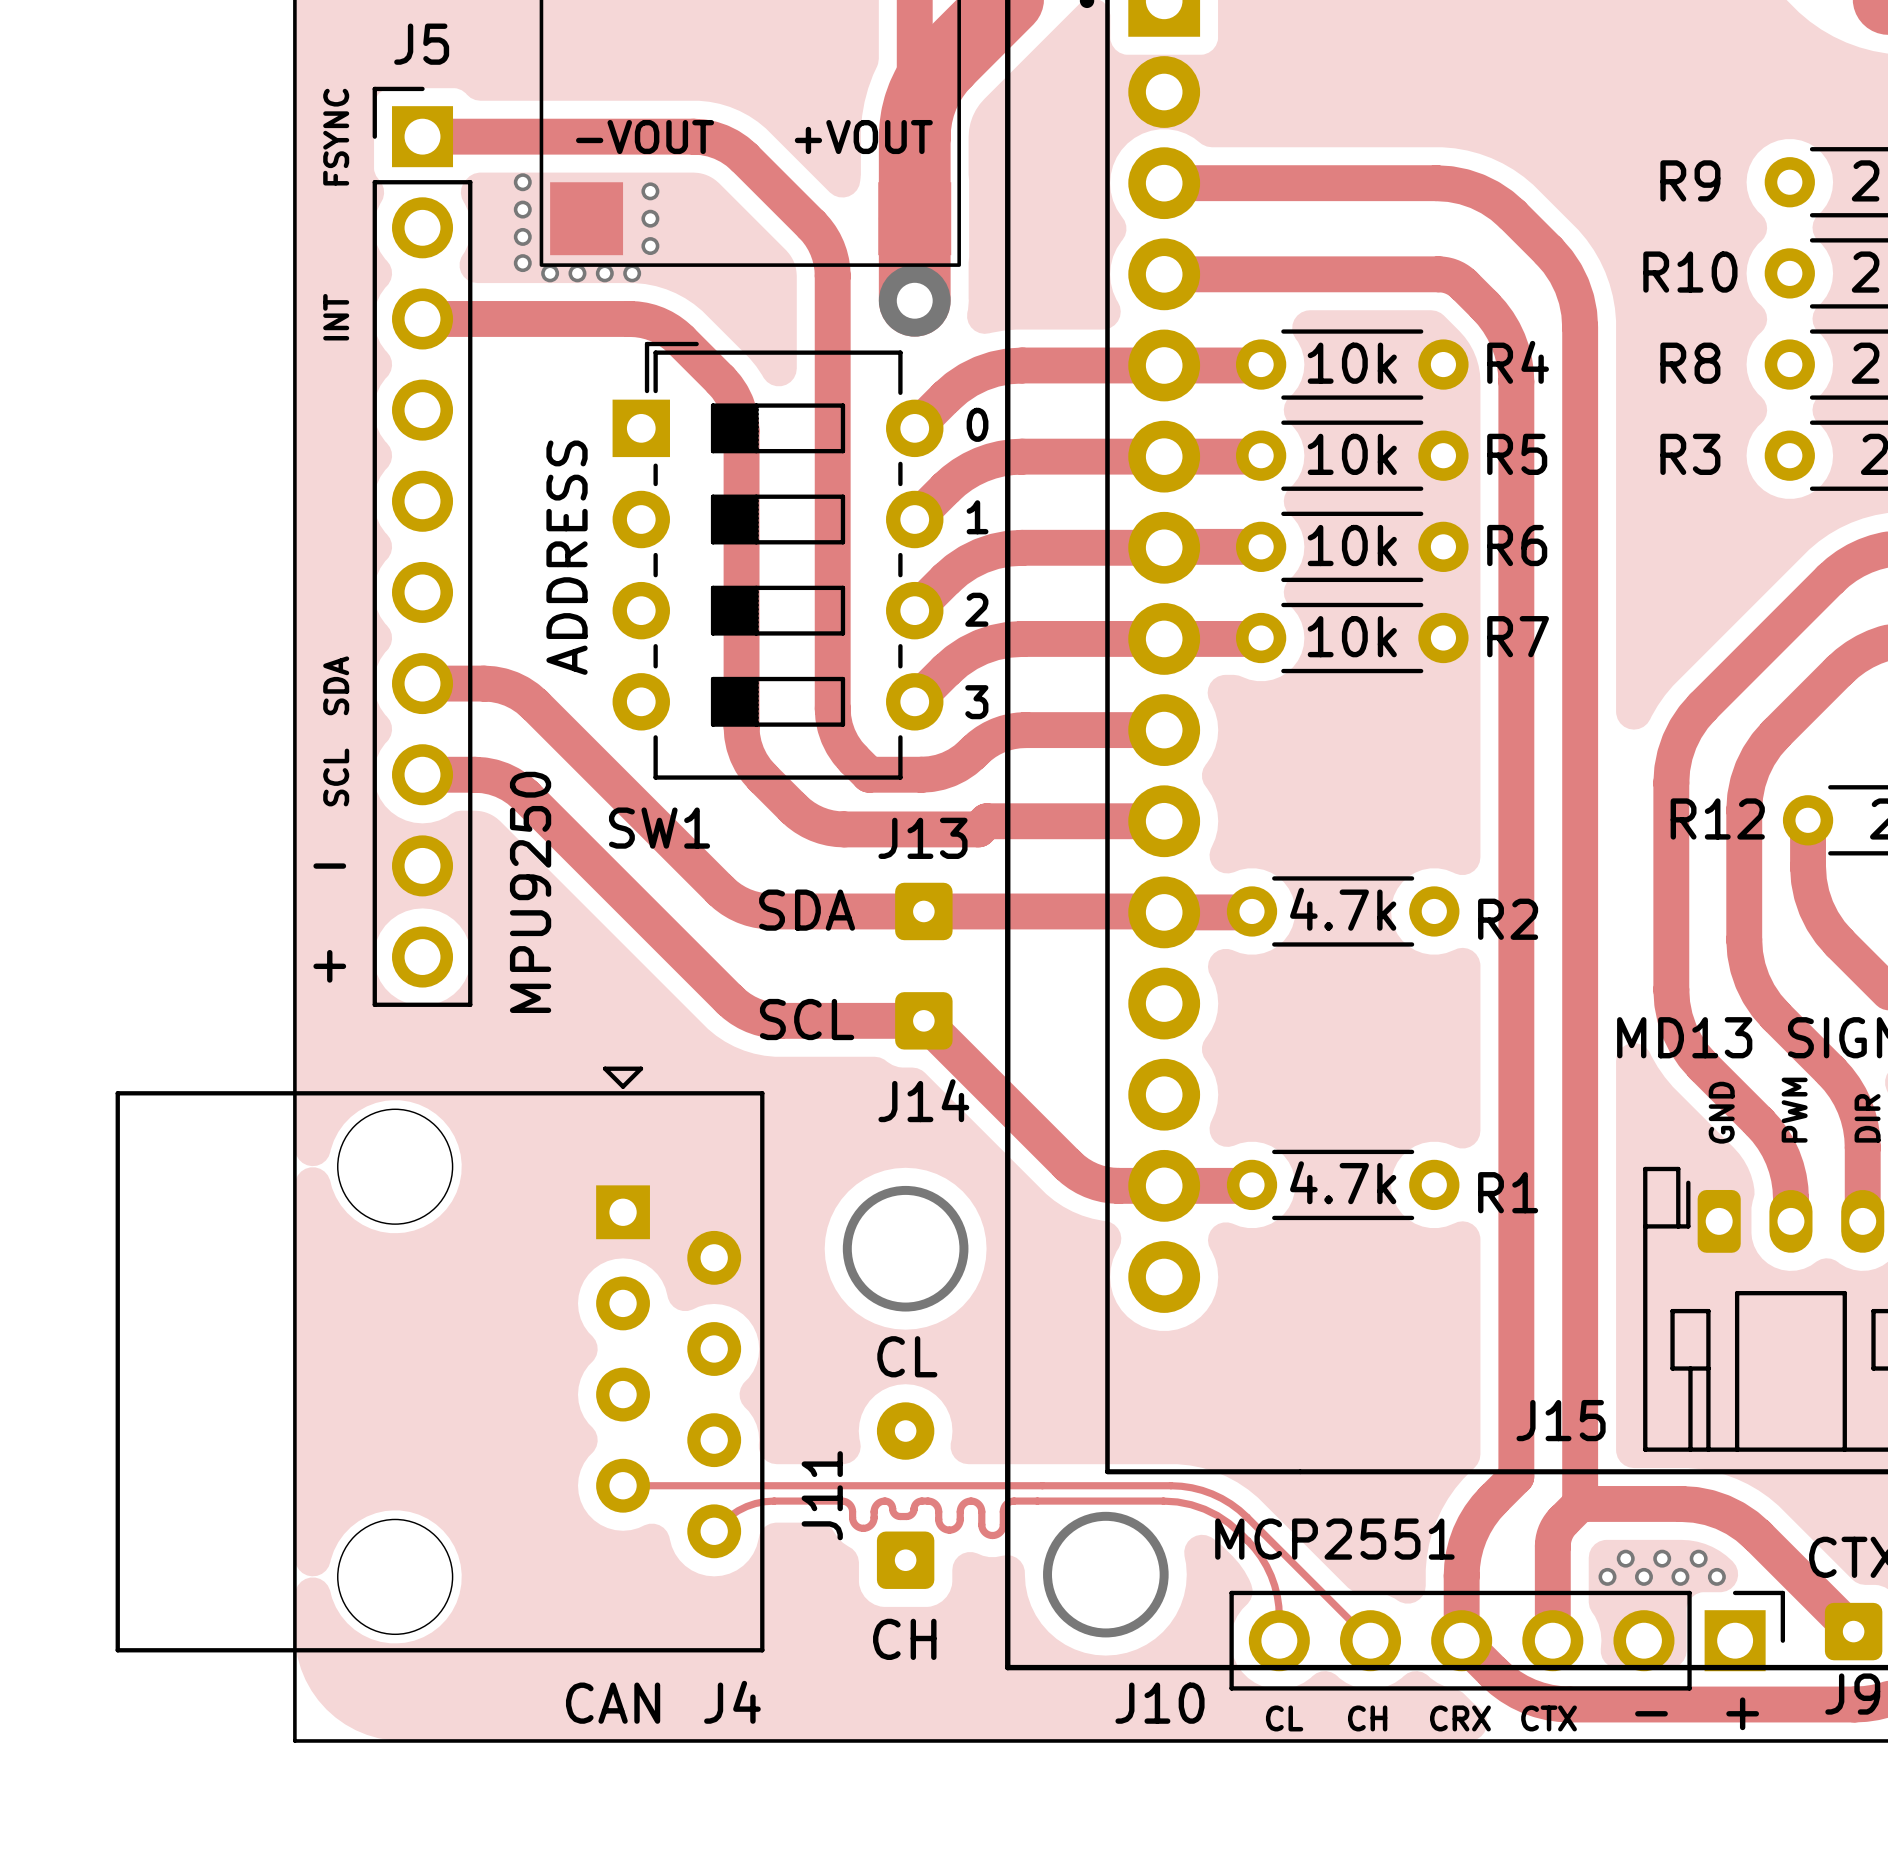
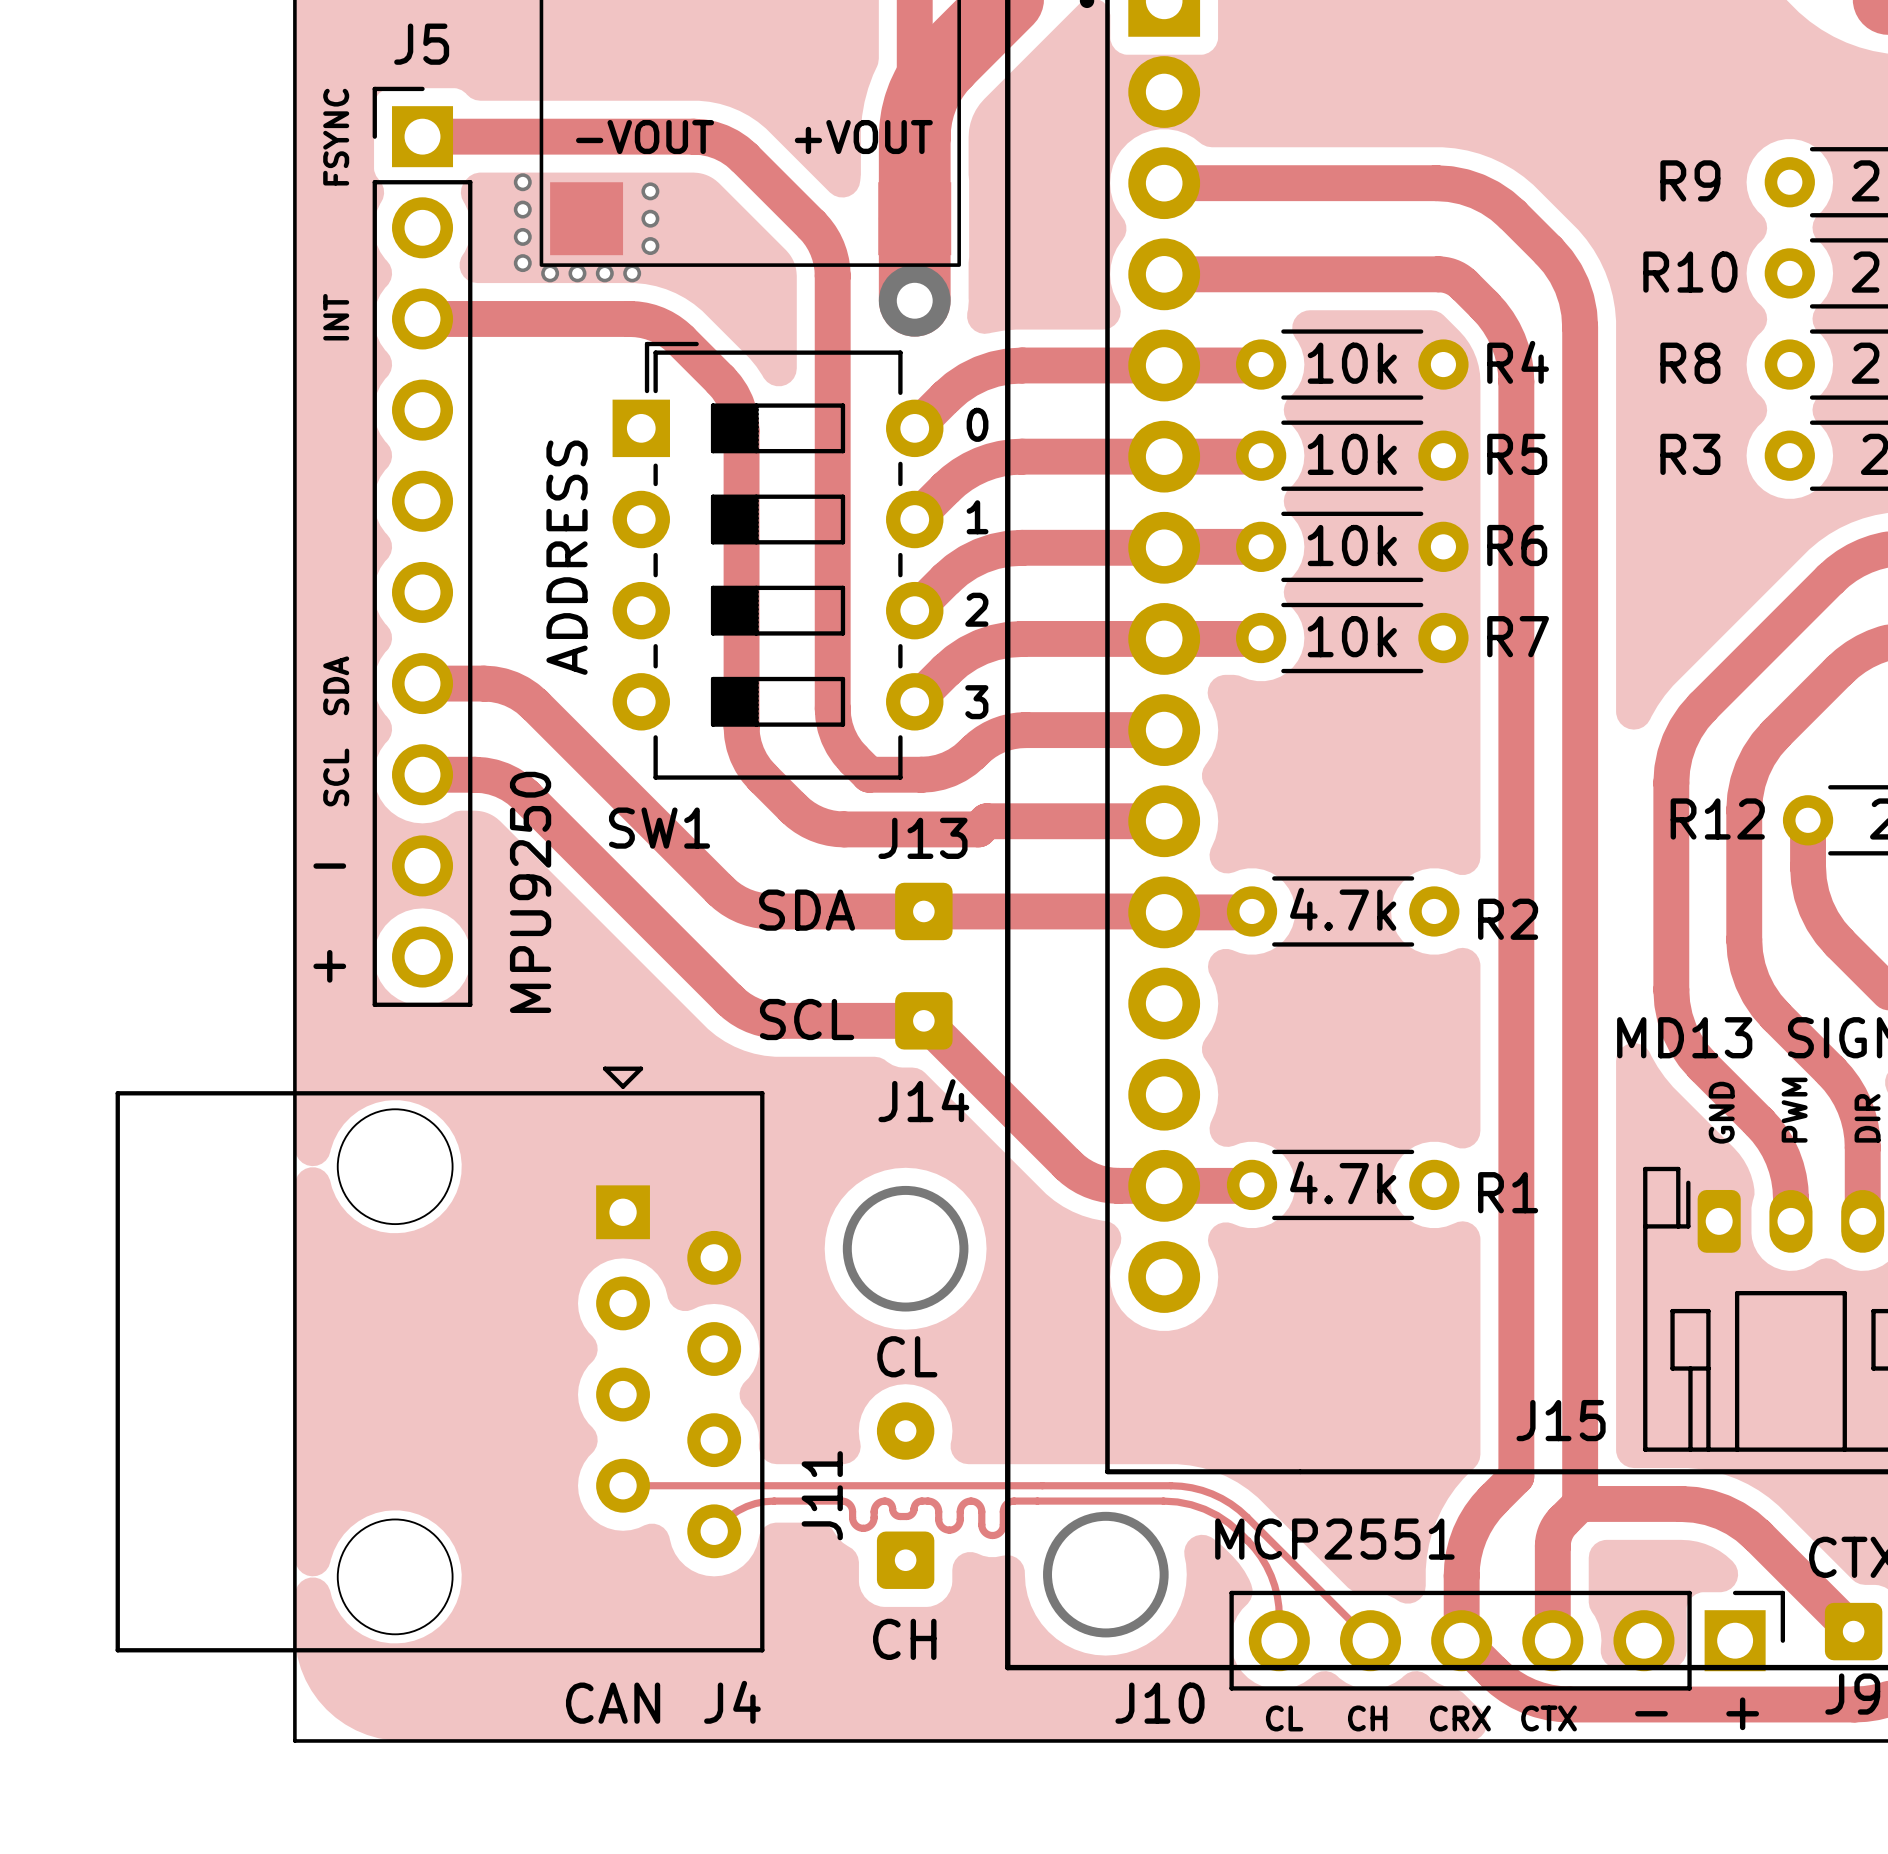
via: (1625, 1558) -> none
via: (1662, 1558) -> none
via: (1698, 1558) -> none
via: (1607, 1576) -> none
via: (1643, 1576) -> none
via: (1680, 1576) -> none
via: (1716, 1576) -> none

